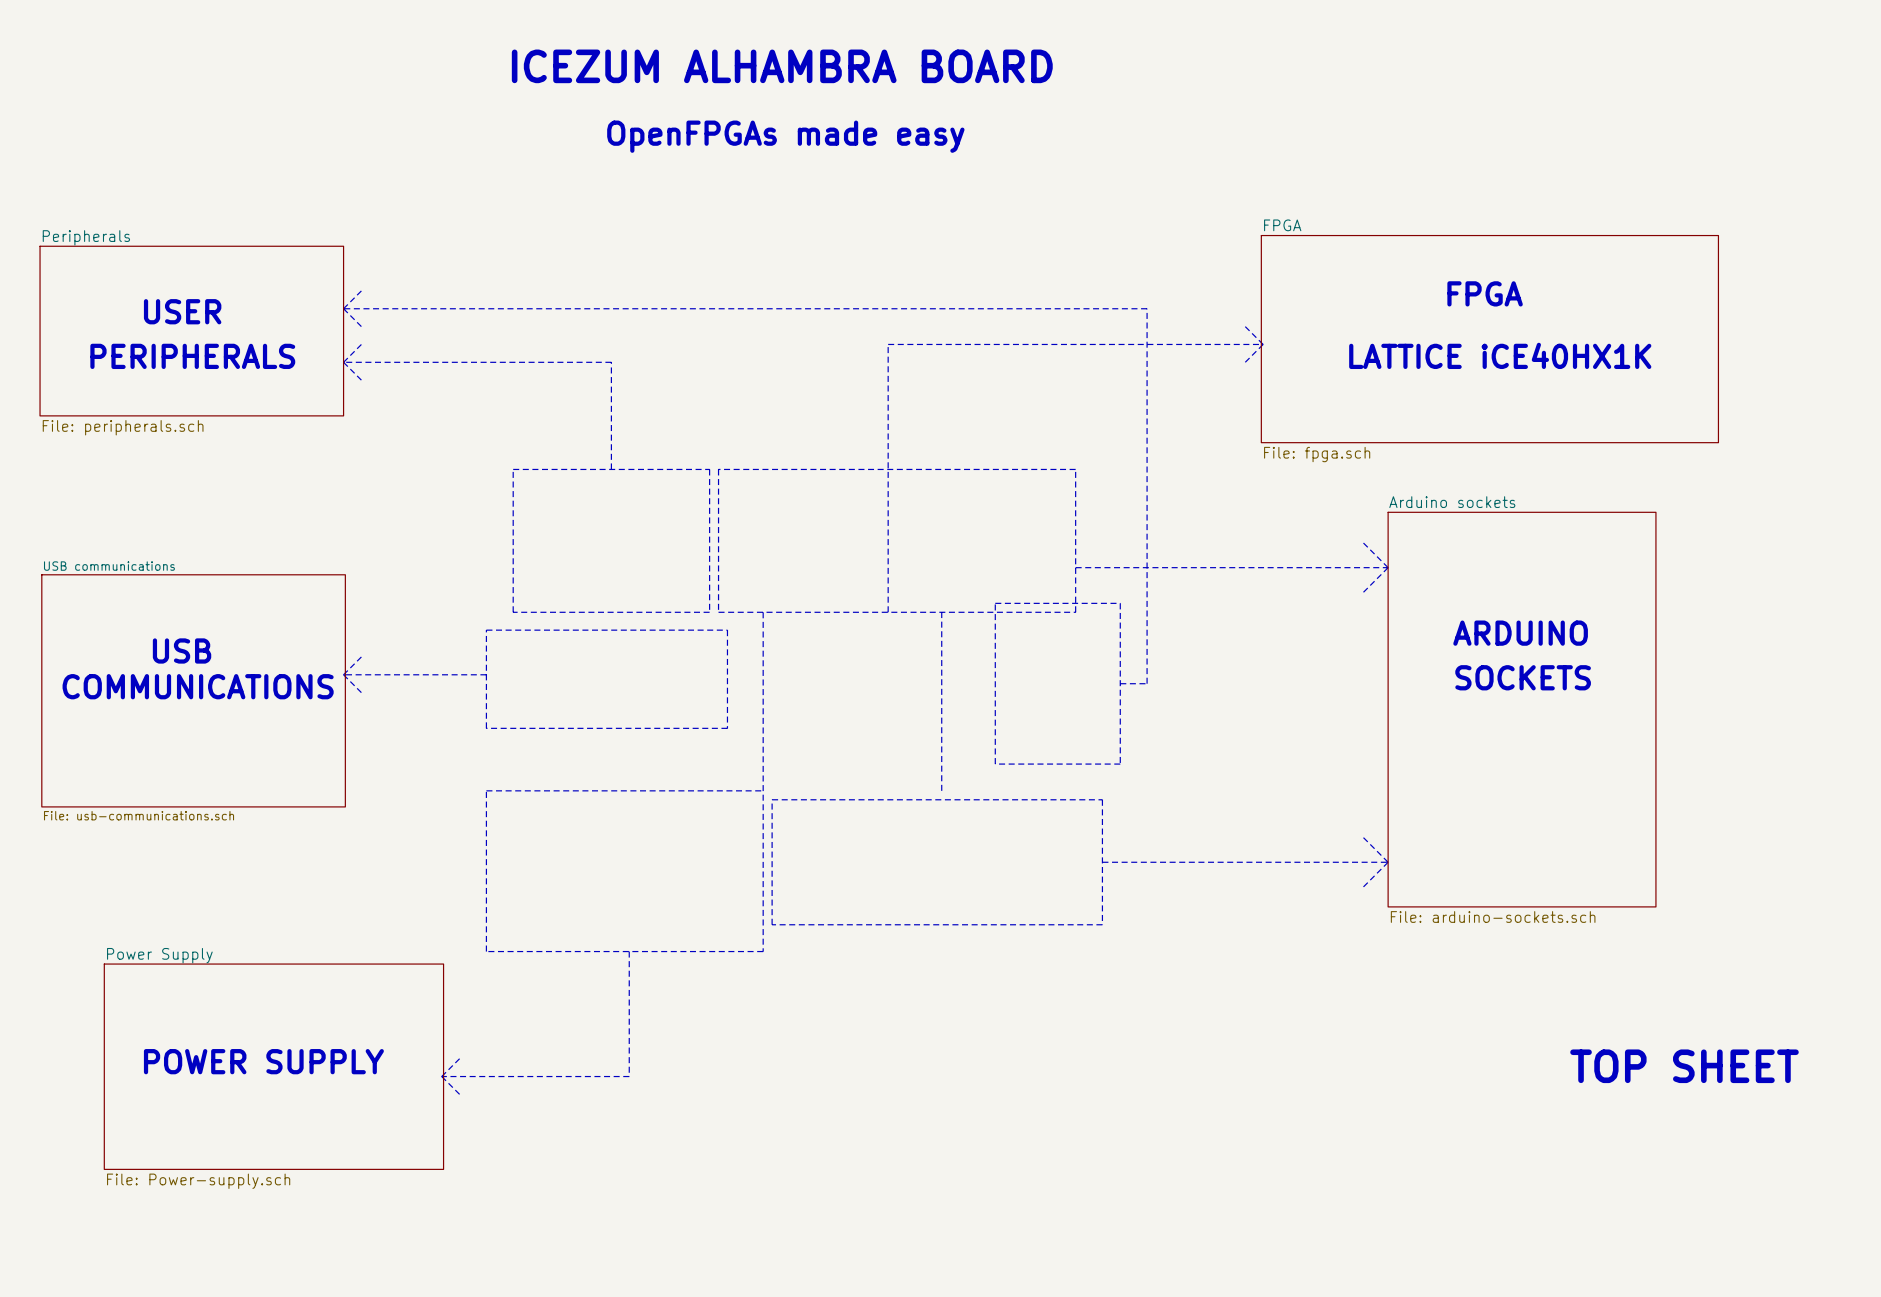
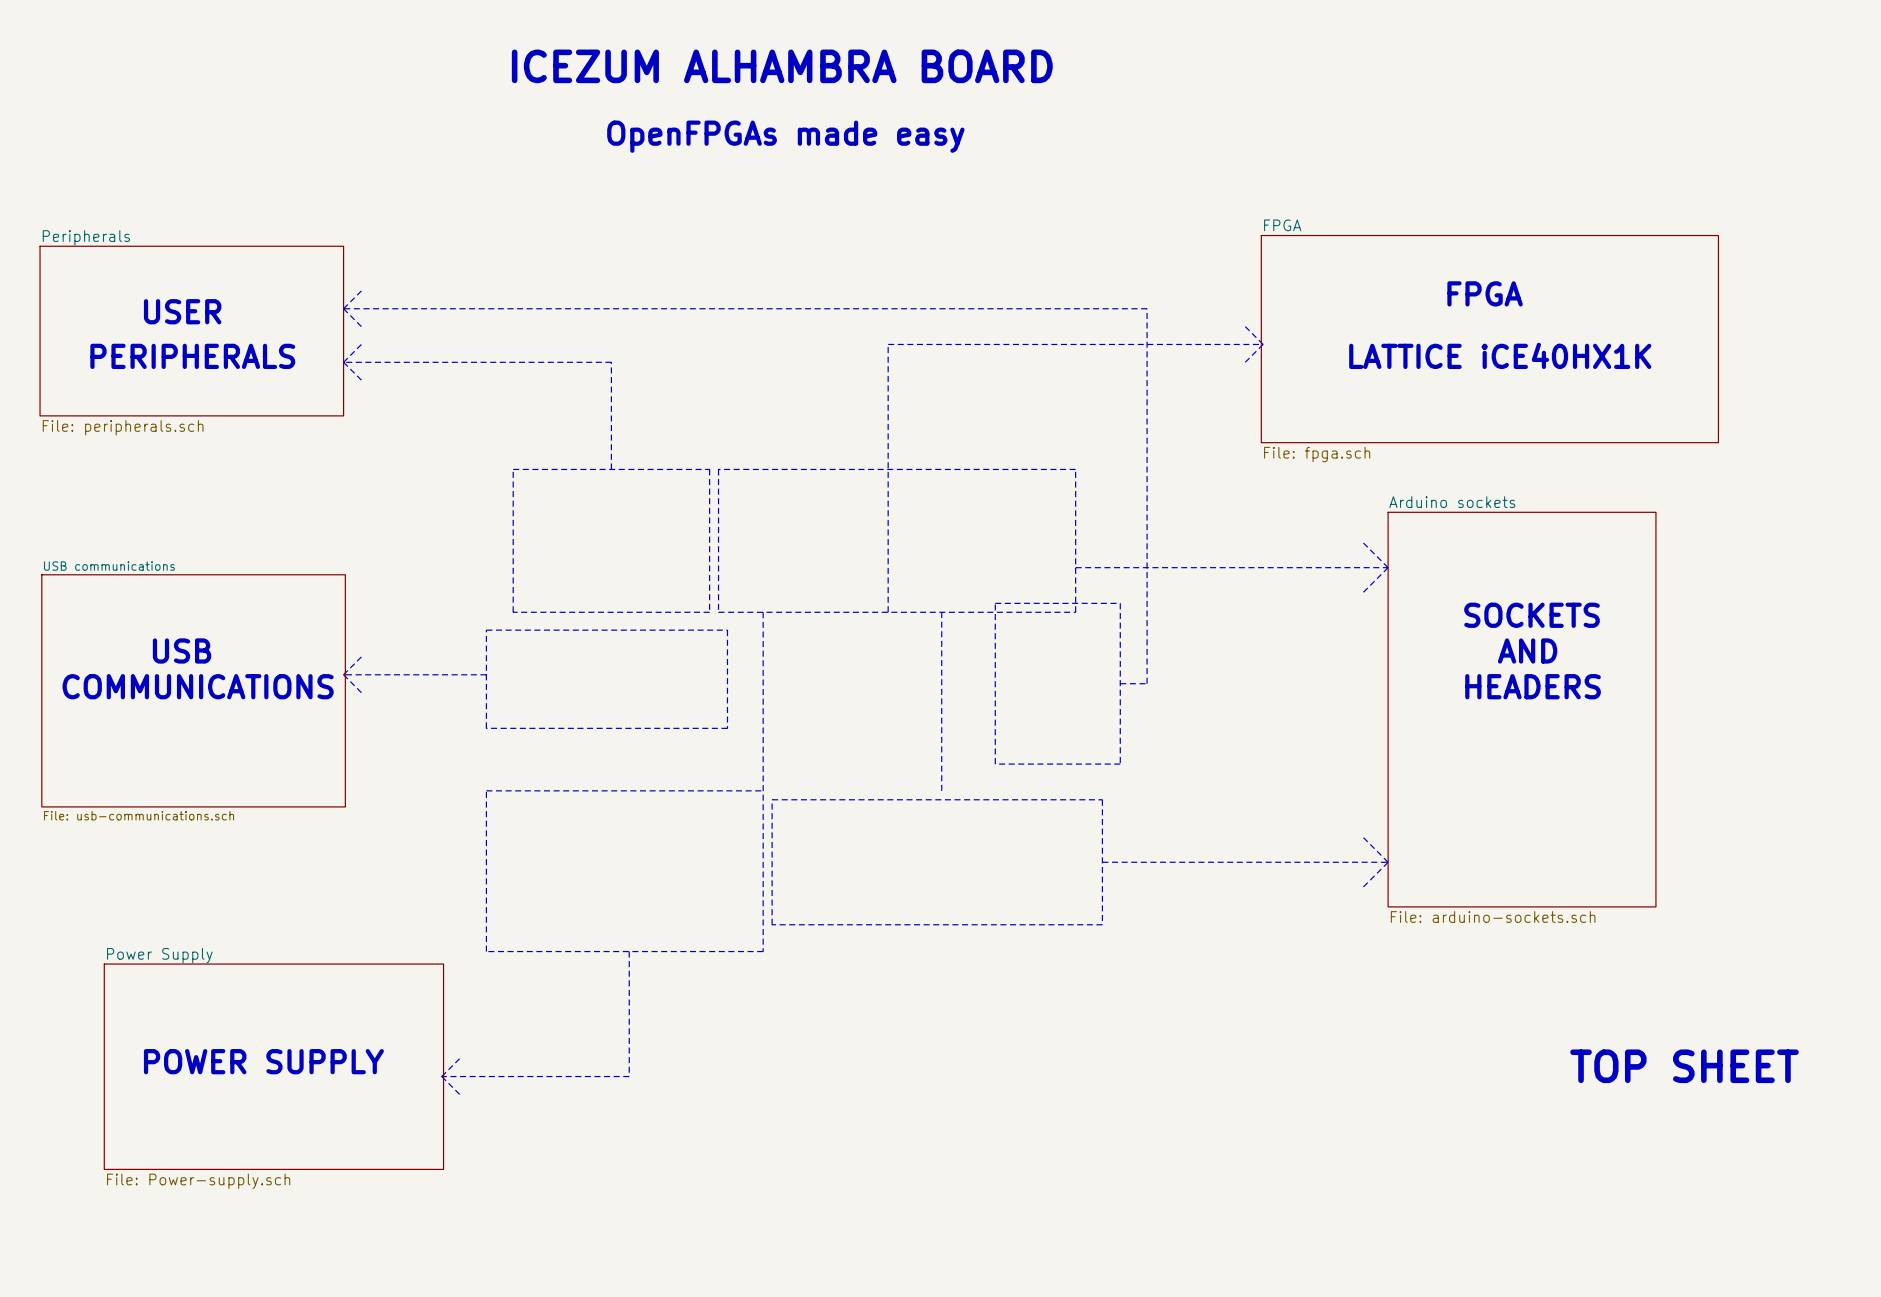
text: ARDUINO (1520, 633) -> none
text: none -> AND (1527, 650)
text position: SOCKETS (1523, 677) -> SOCKETS (1532, 615)
text: none -> HEADERS (1533, 686)

